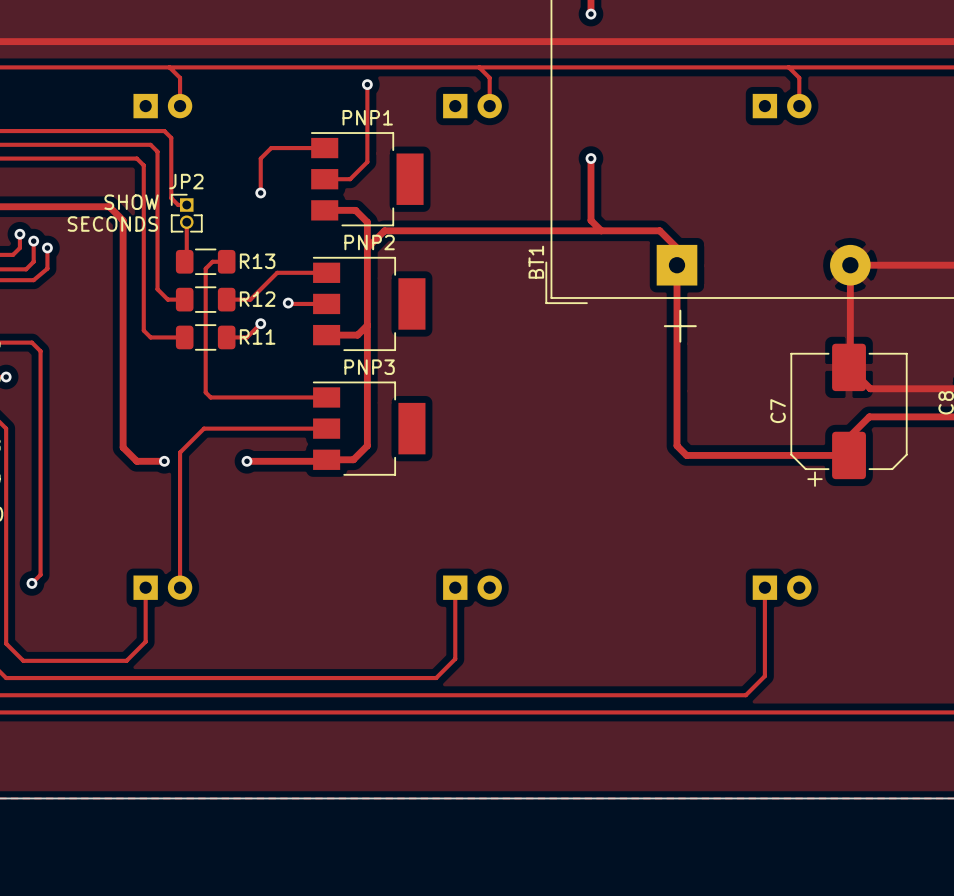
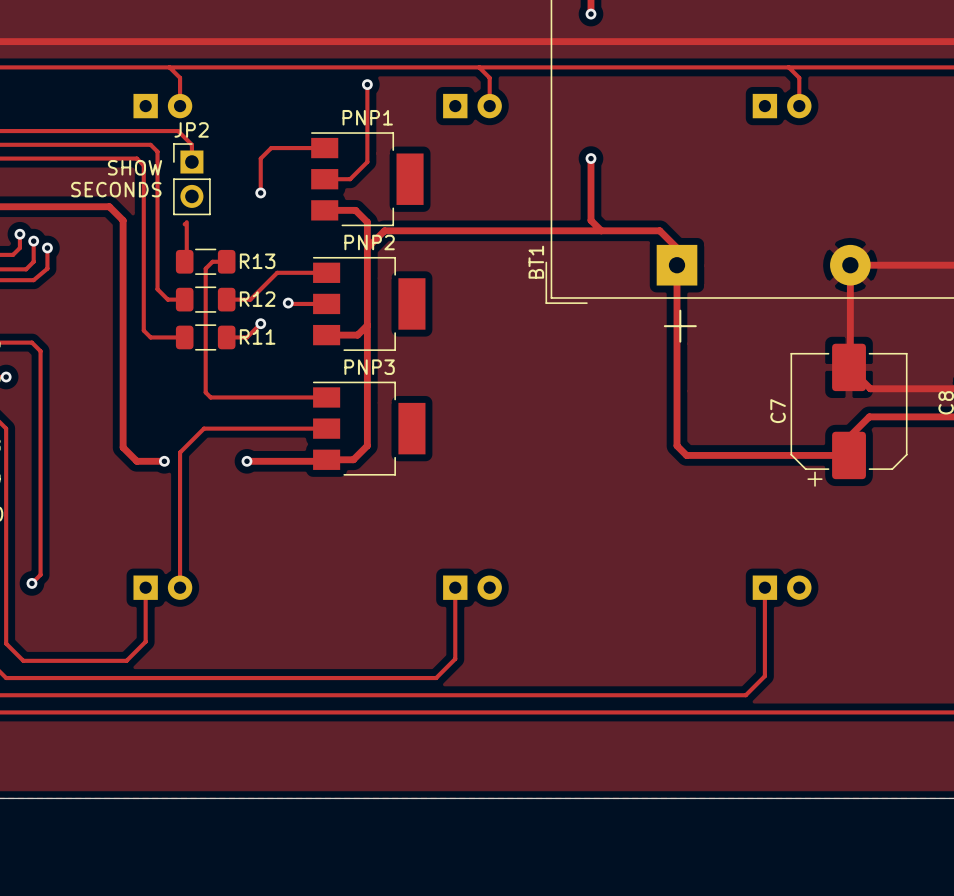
track: (164, 131) (171, 137) (171, 198) (178, 205) (186, 205) -> (164, 131) (178, 131) (191, 144) (191, 162)
JP2 footprint: [170, 193, 203, 233] -> [173, 143, 211, 216]
text position: SHOW (131, 202) -> SHOW (135, 167)
text position: SECONDS (112, 224) -> SECONDS (116, 189)

